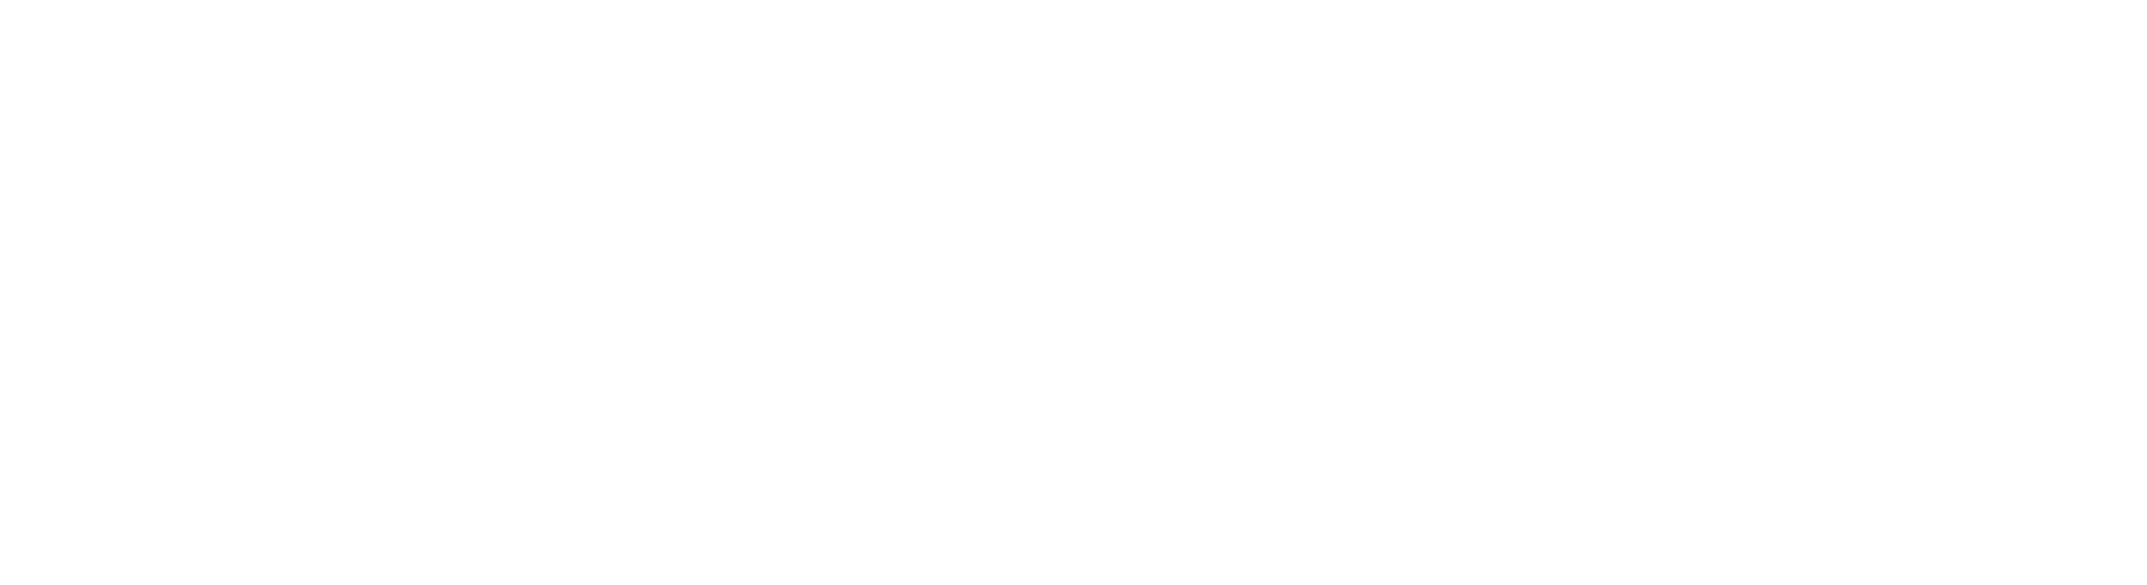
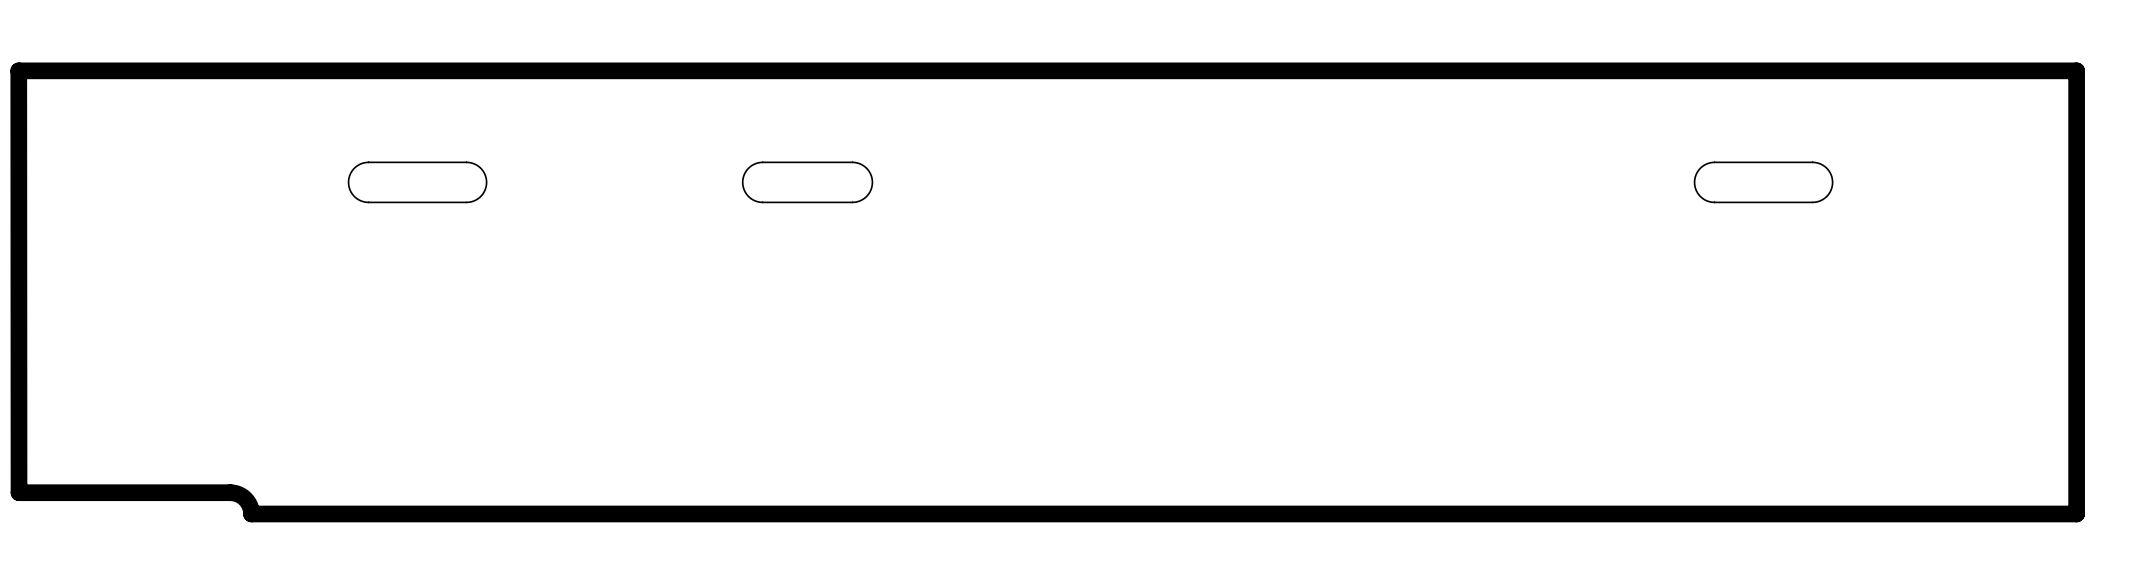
board edge: none -> (18, 70) (2076, 70) (2076, 513) (251, 513) (247, 501) (240, 495) (233, 492) (19, 492) (18, 70)
board edge: none -> (762, 162) (857, 162) (868, 171) (872, 179) (871, 187) (865, 197) (854, 202) (757, 201) (746, 193) (742, 179) (749, 167) (762, 162)
board edge: none -> (466, 202) (363, 201) (357, 198) (350, 191) (349, 177) (355, 167) (366, 162) (471, 162) (483, 171) (486, 184) (479, 197) (466, 202)
board edge: none -> (1812, 202) (1709, 201) (1702, 198) (1697, 192) (1694, 184) (1695, 177) (1702, 166) (1711, 162) (1817, 163) (1828, 170) (1831, 177) (1832, 184) (1829, 192) (1824, 198) (1812, 202)

